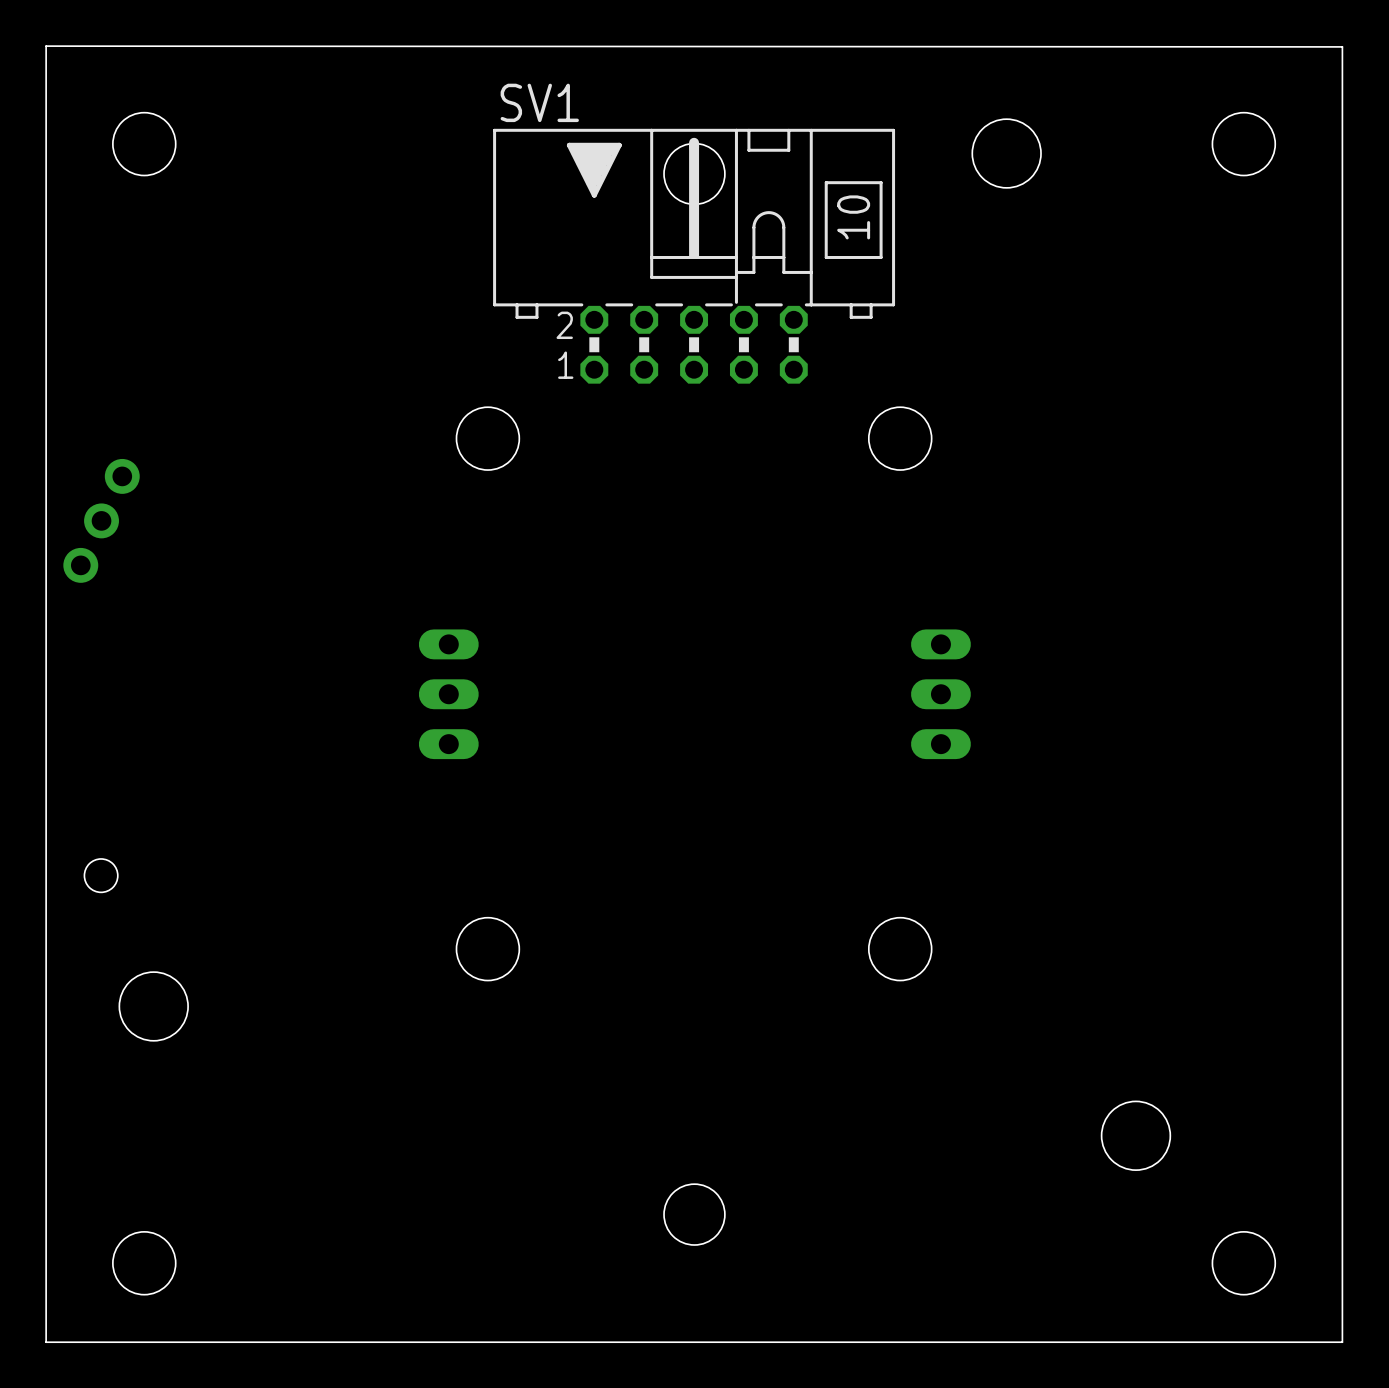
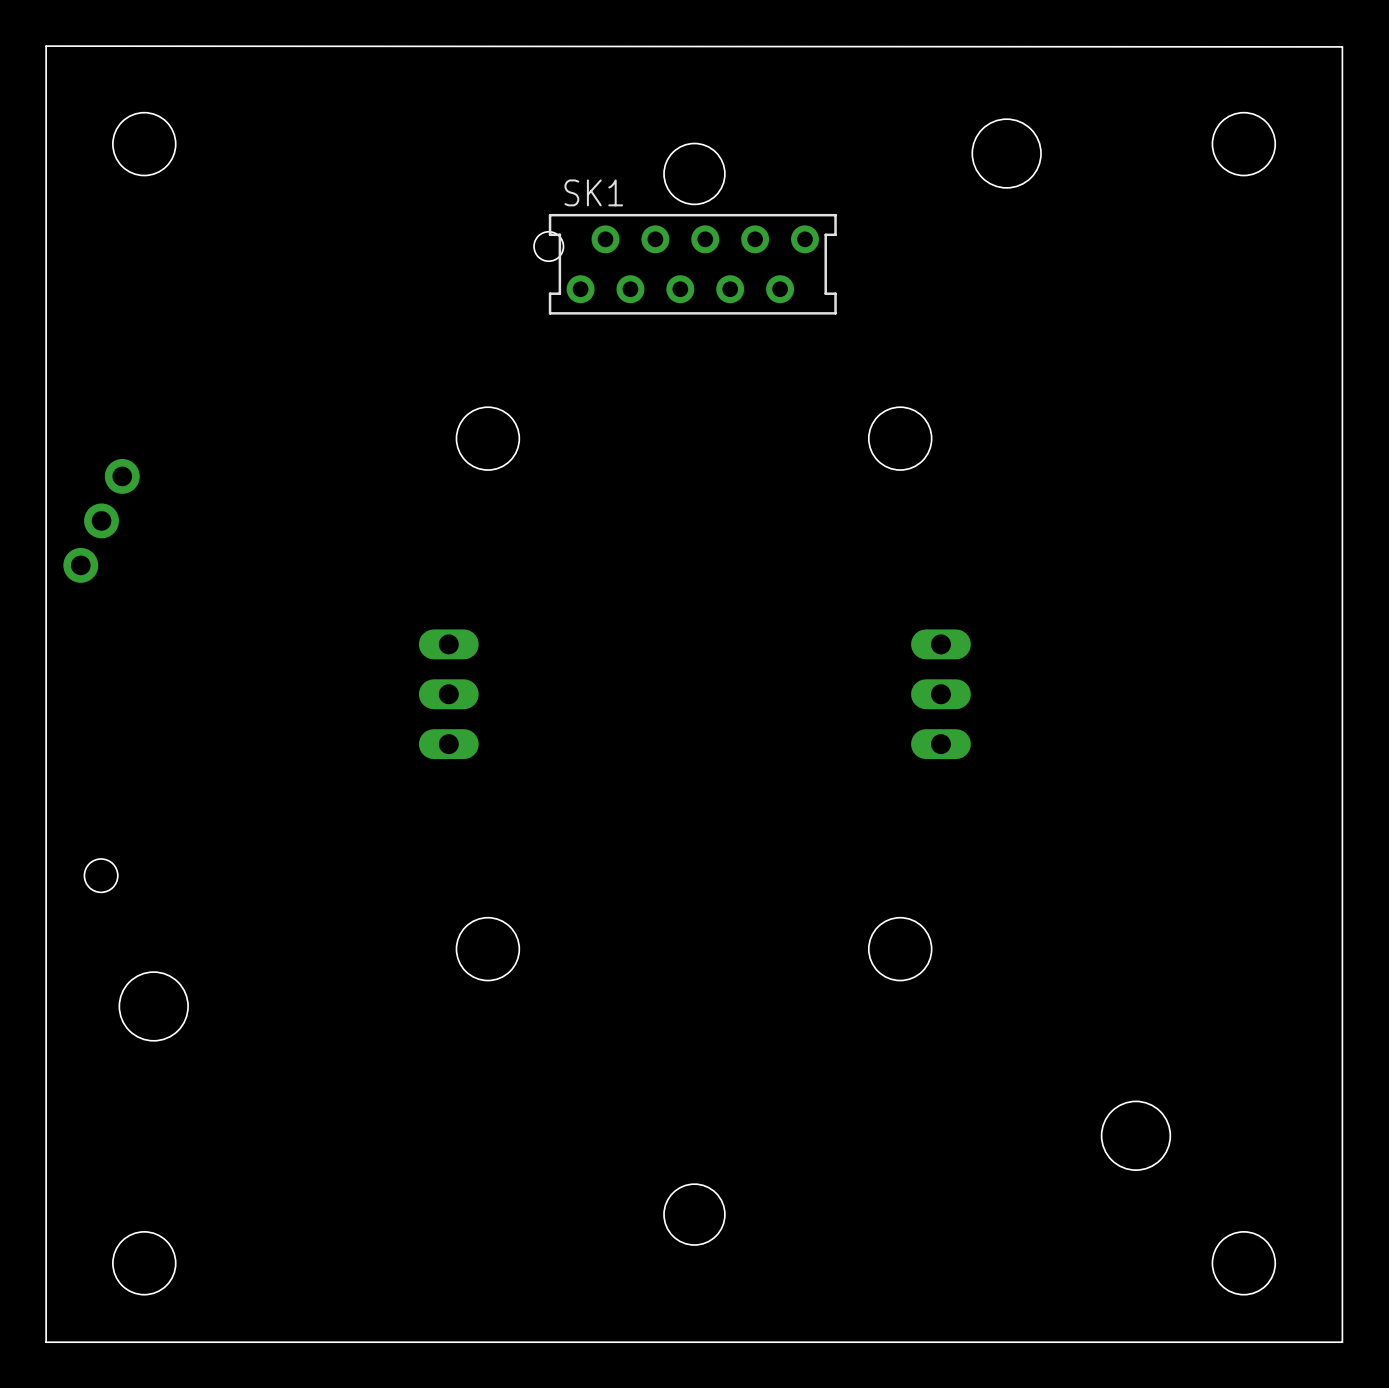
SV1: (694, 256) -> none
SK1: none -> (685, 264)

